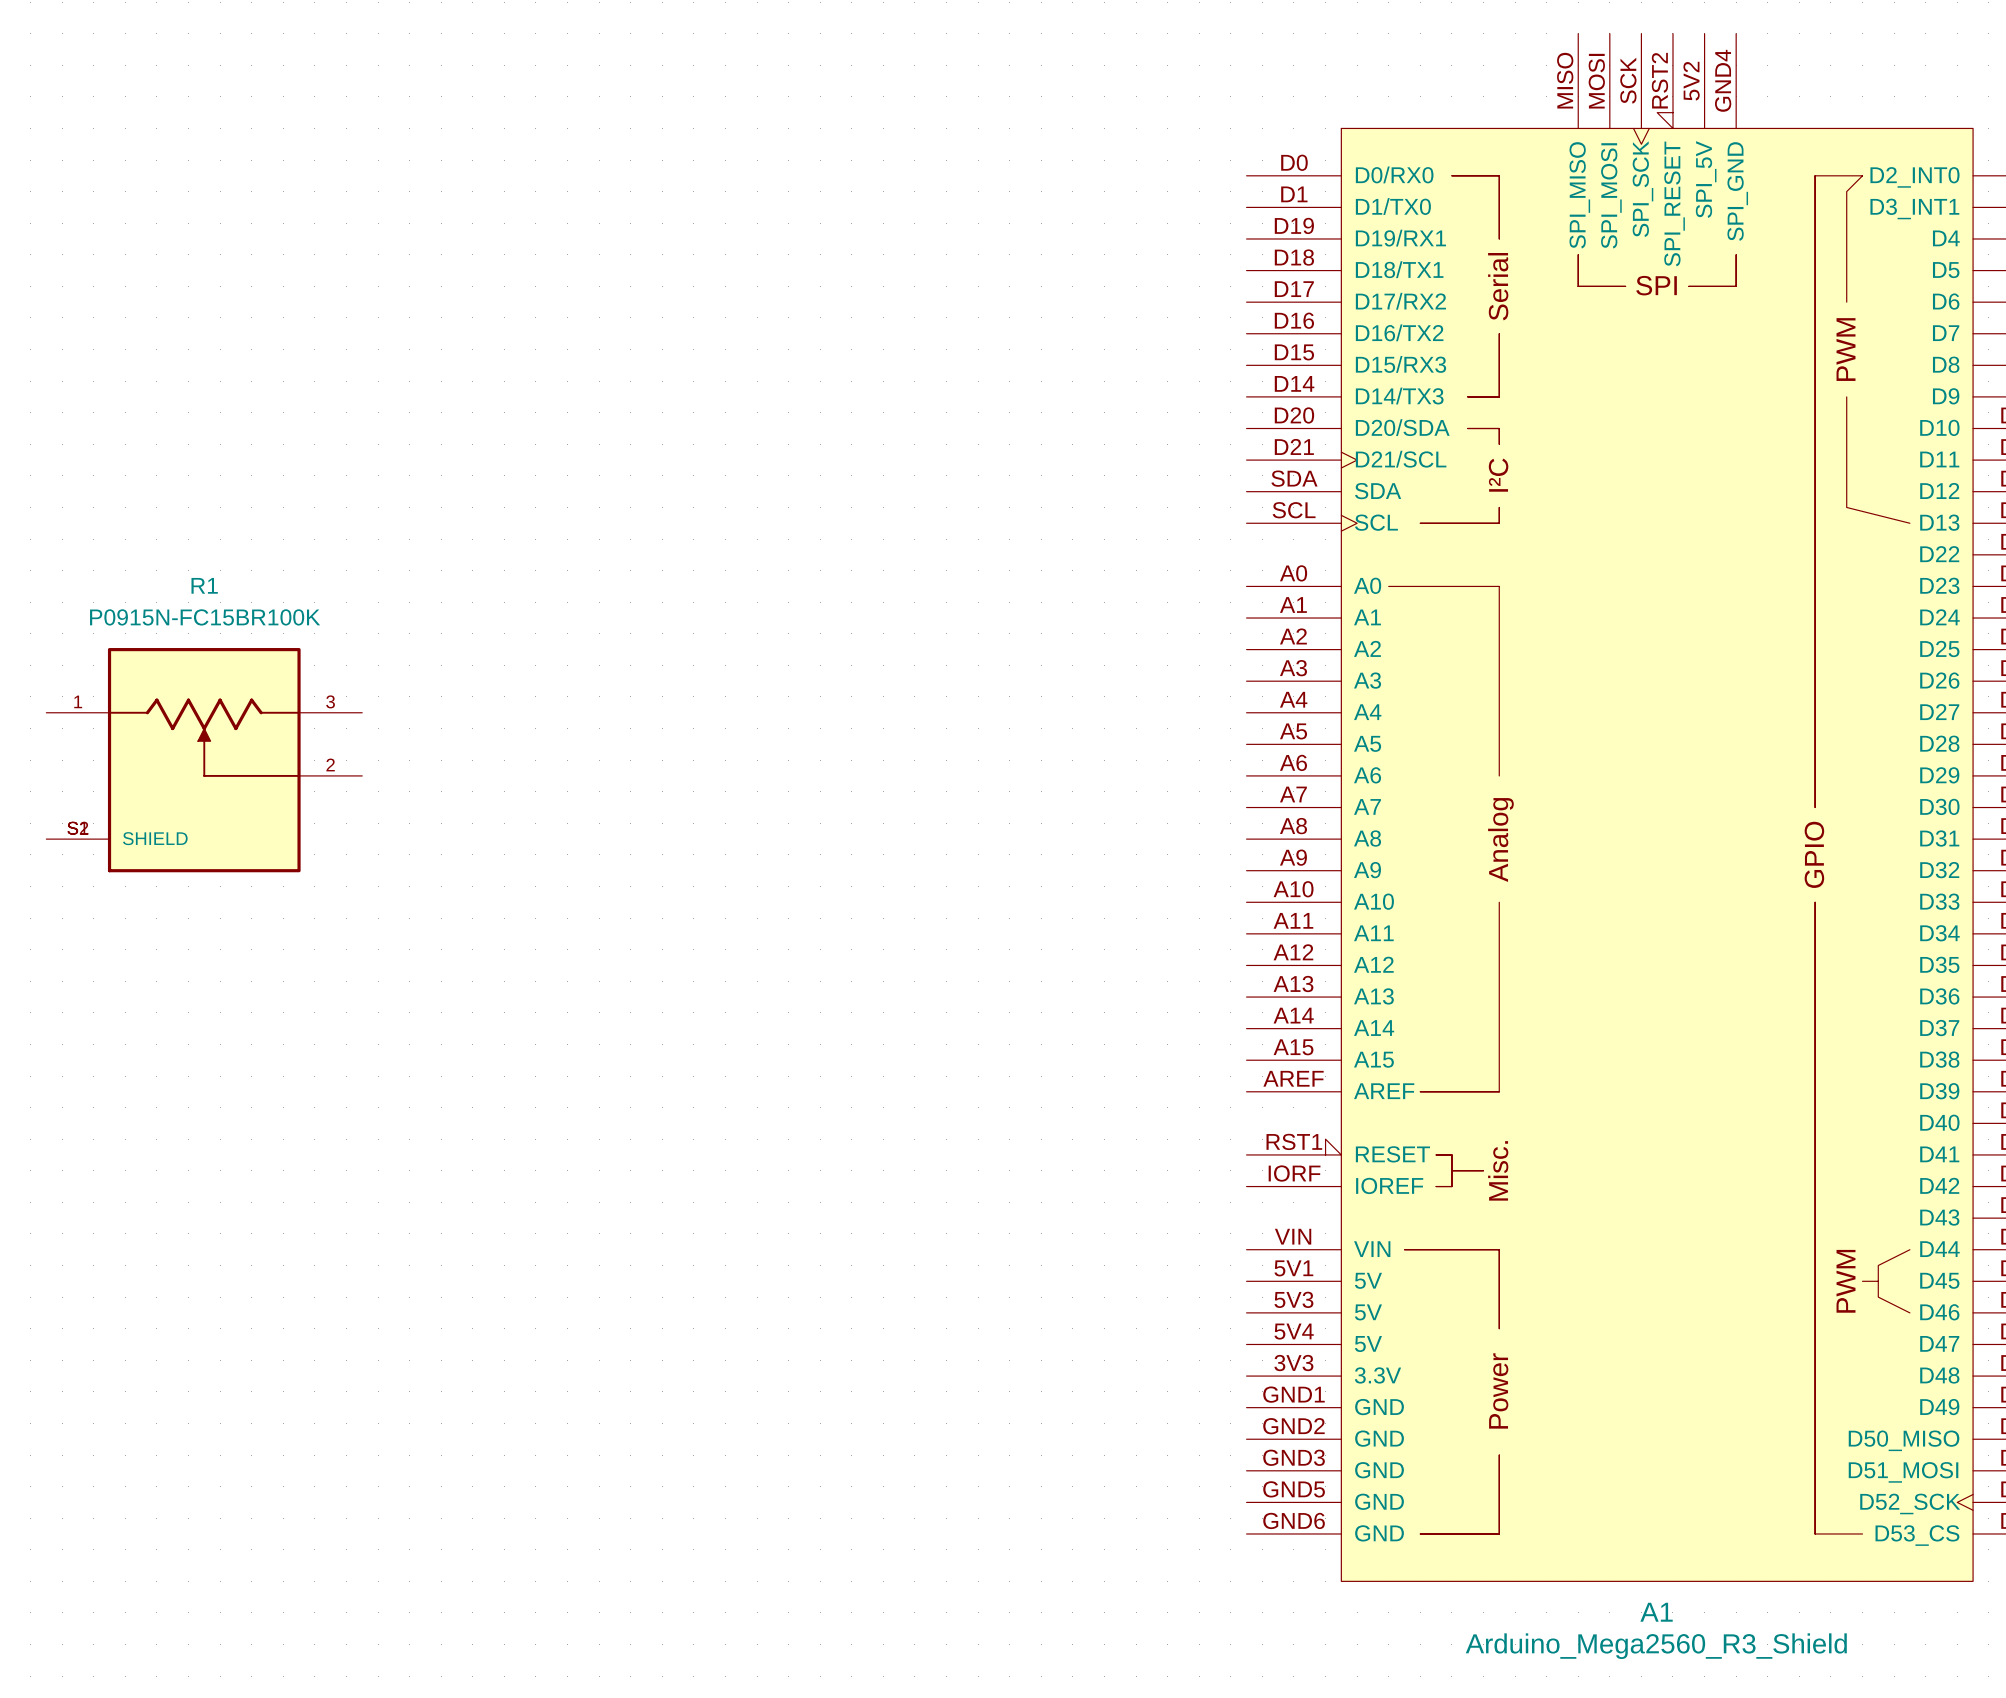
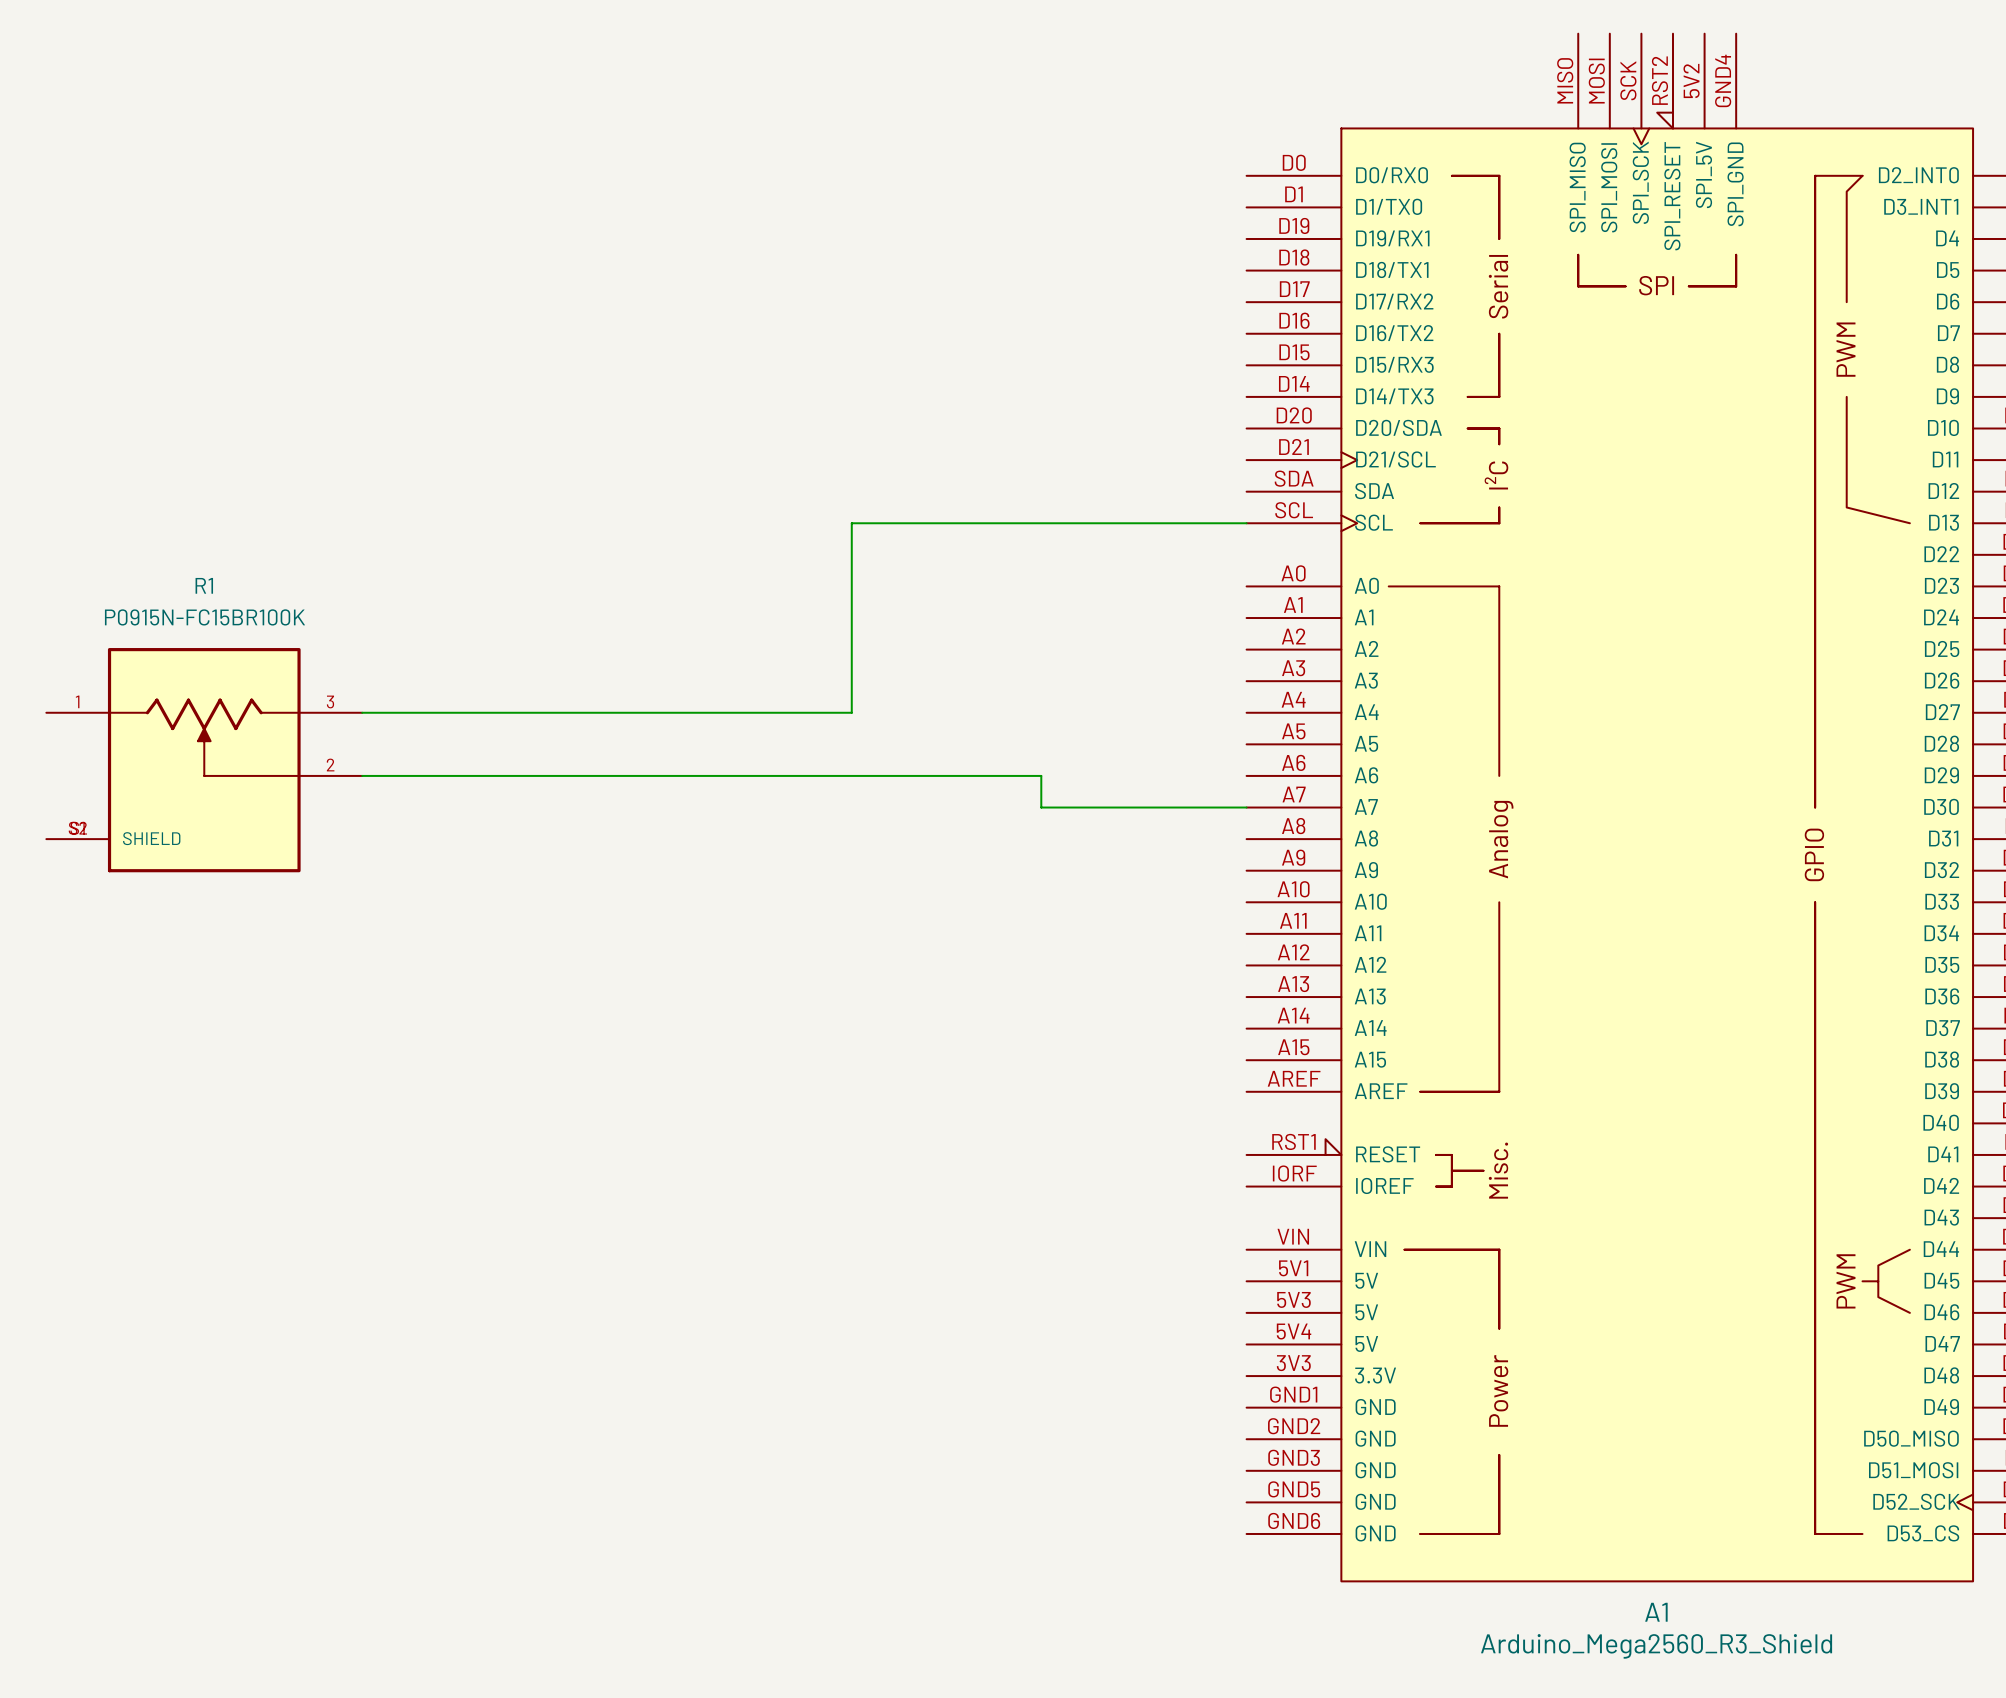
wire: none -> (1246, 523) (851, 523) (851, 712) (362, 712)
wire: none -> (362, 775) (1041, 775) (1041, 807) (1246, 807)

